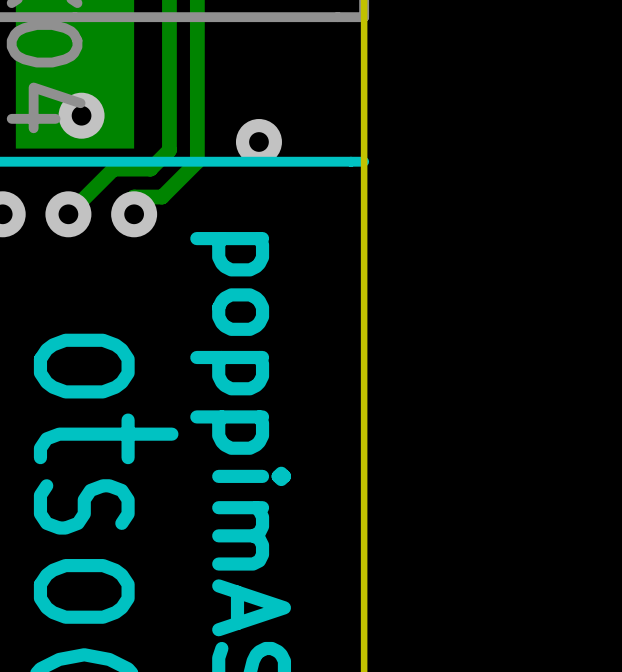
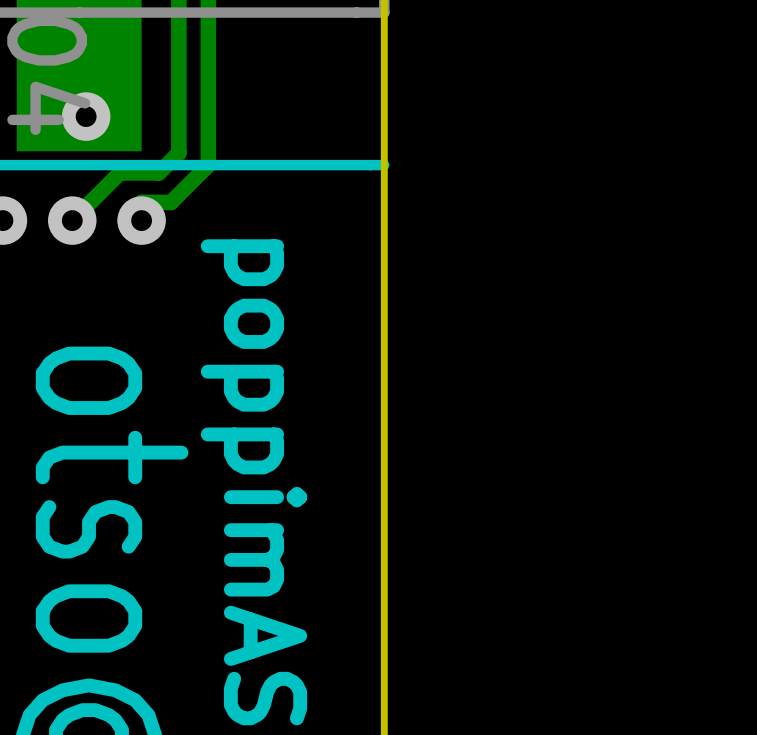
via: (258, 142) -> none

